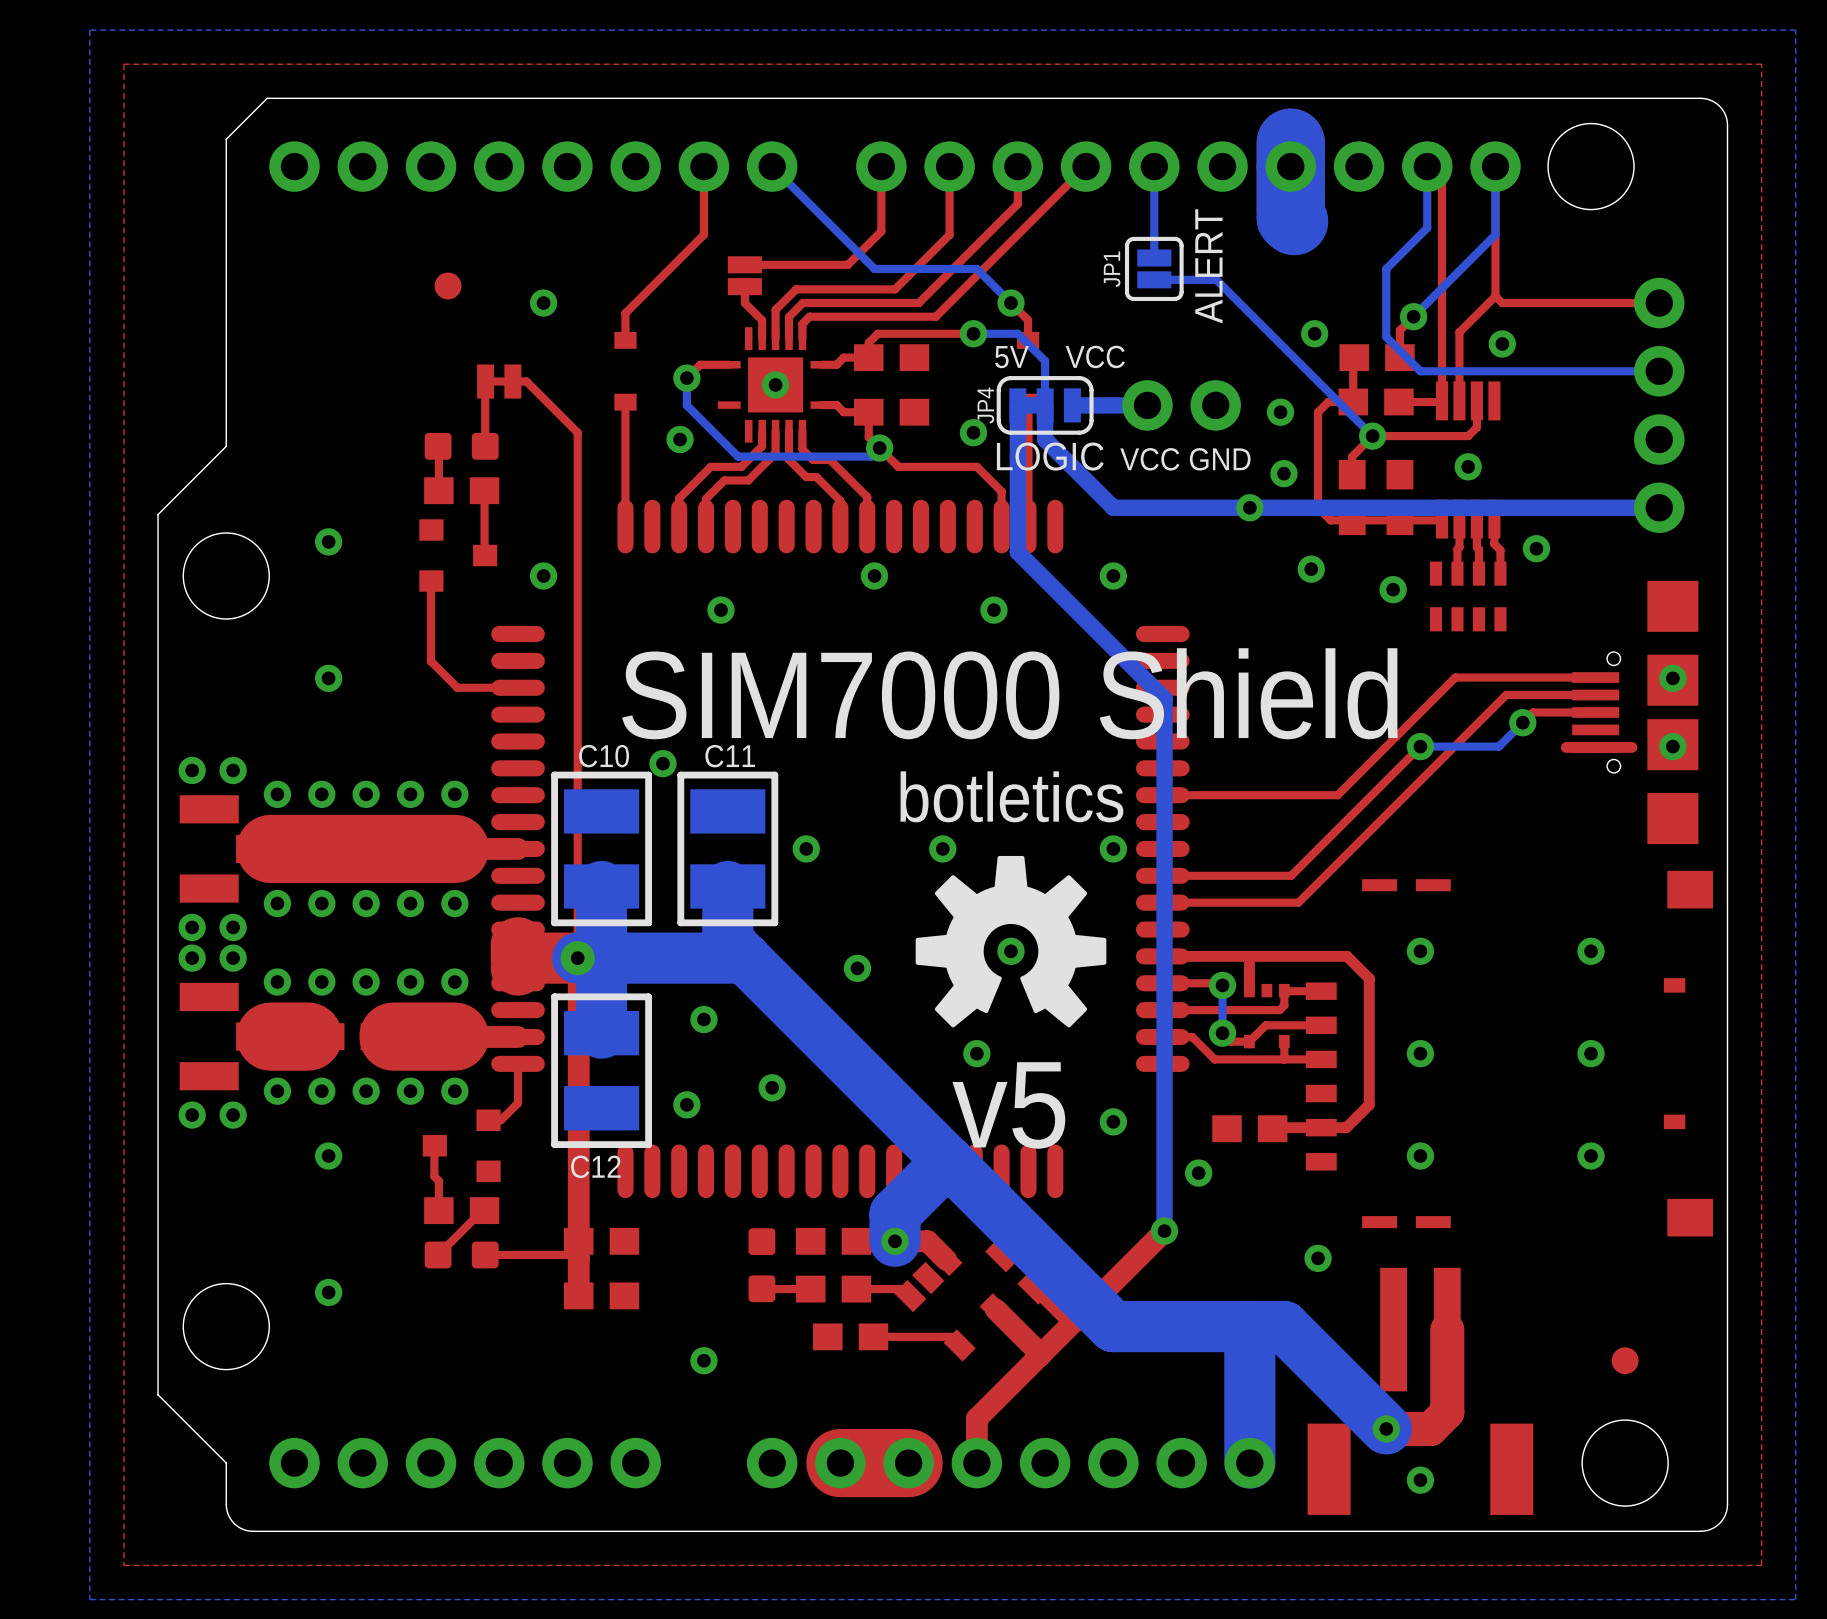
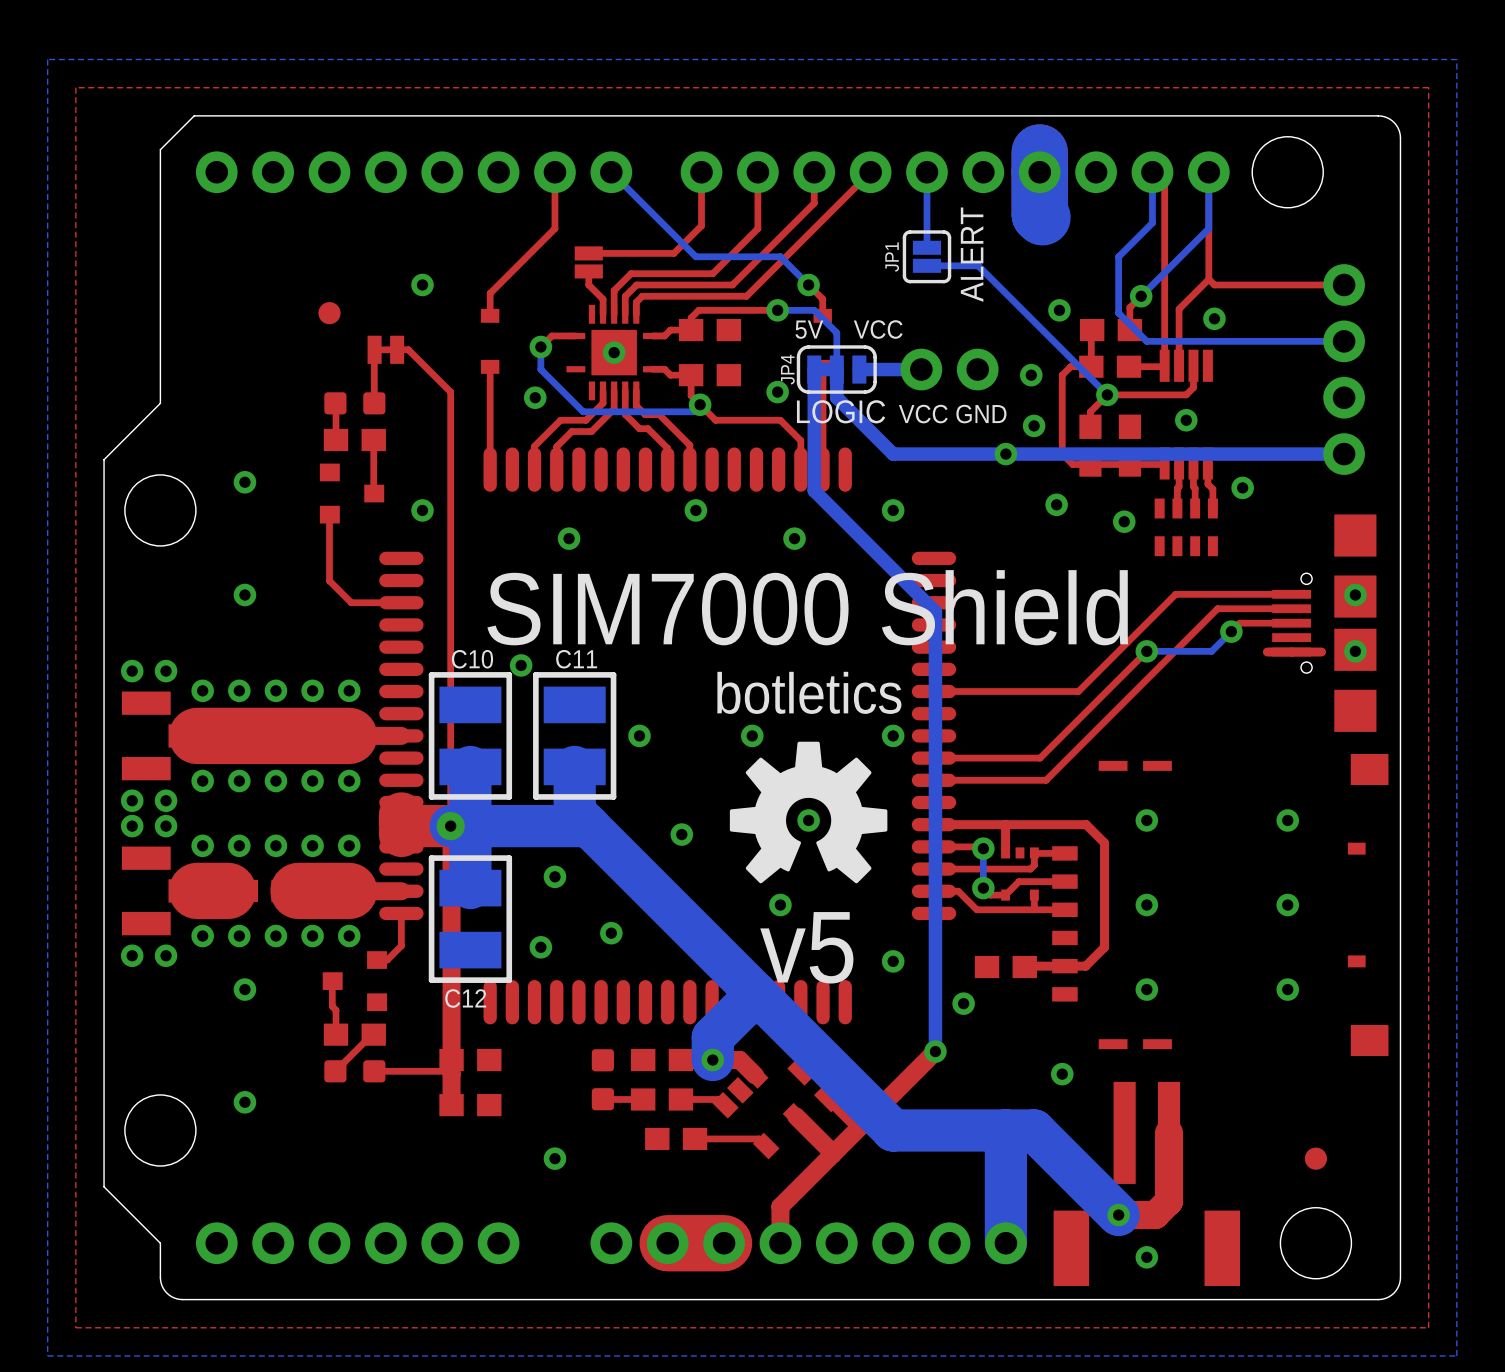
part position: (448, 285) -> (329, 313)

